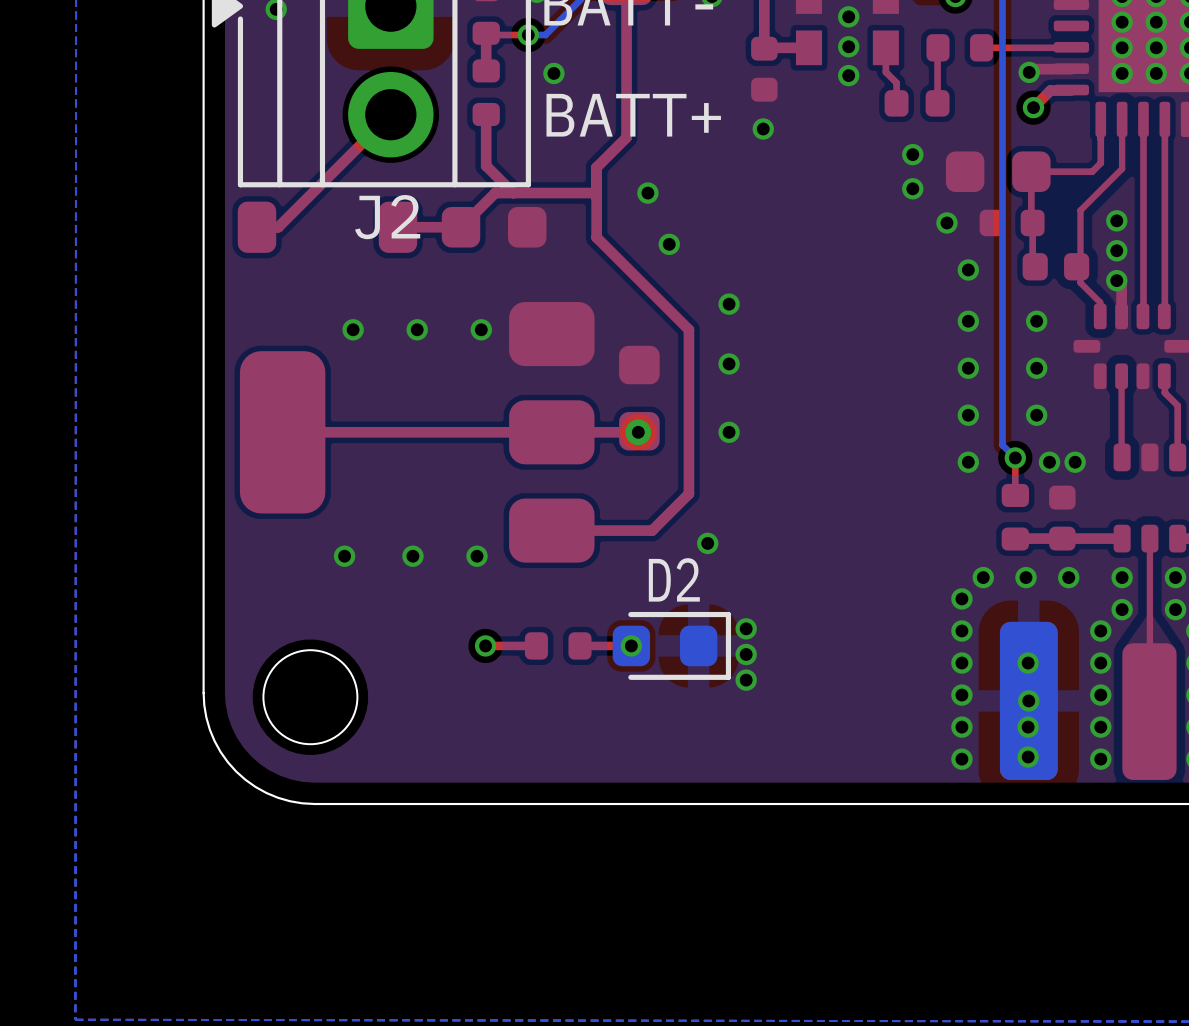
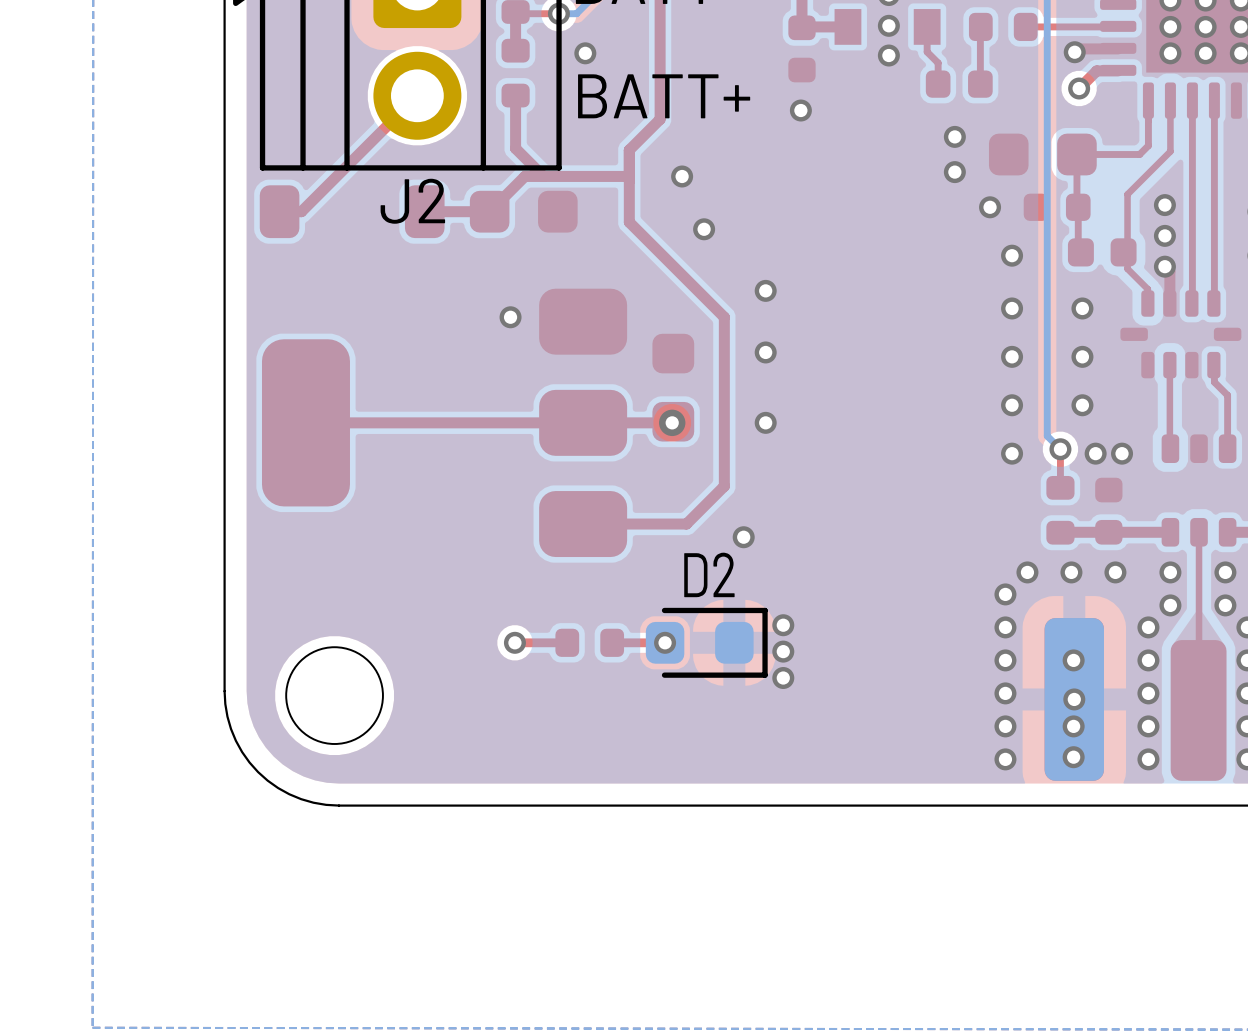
via: (353, 329) -> none
via: (417, 329) -> none
via: (344, 556) -> none
via: (412, 556) -> none
via: (477, 556) -> none

